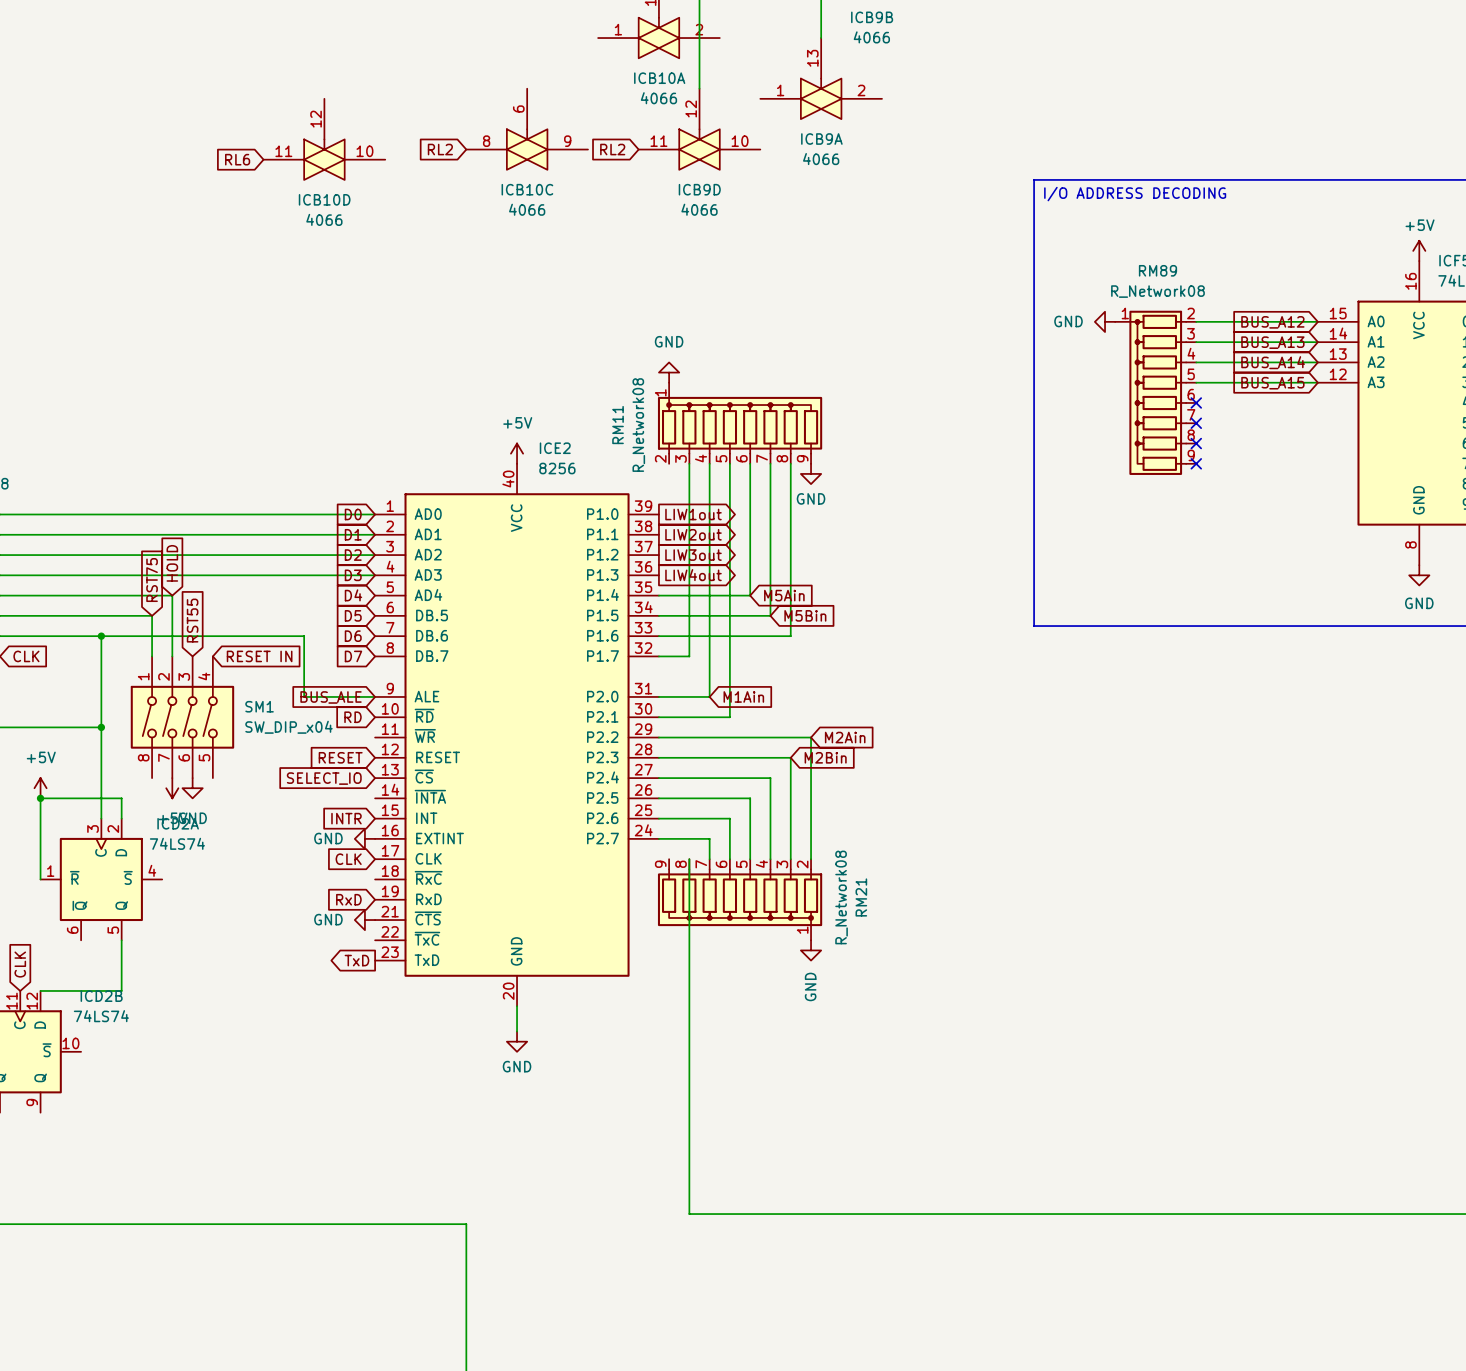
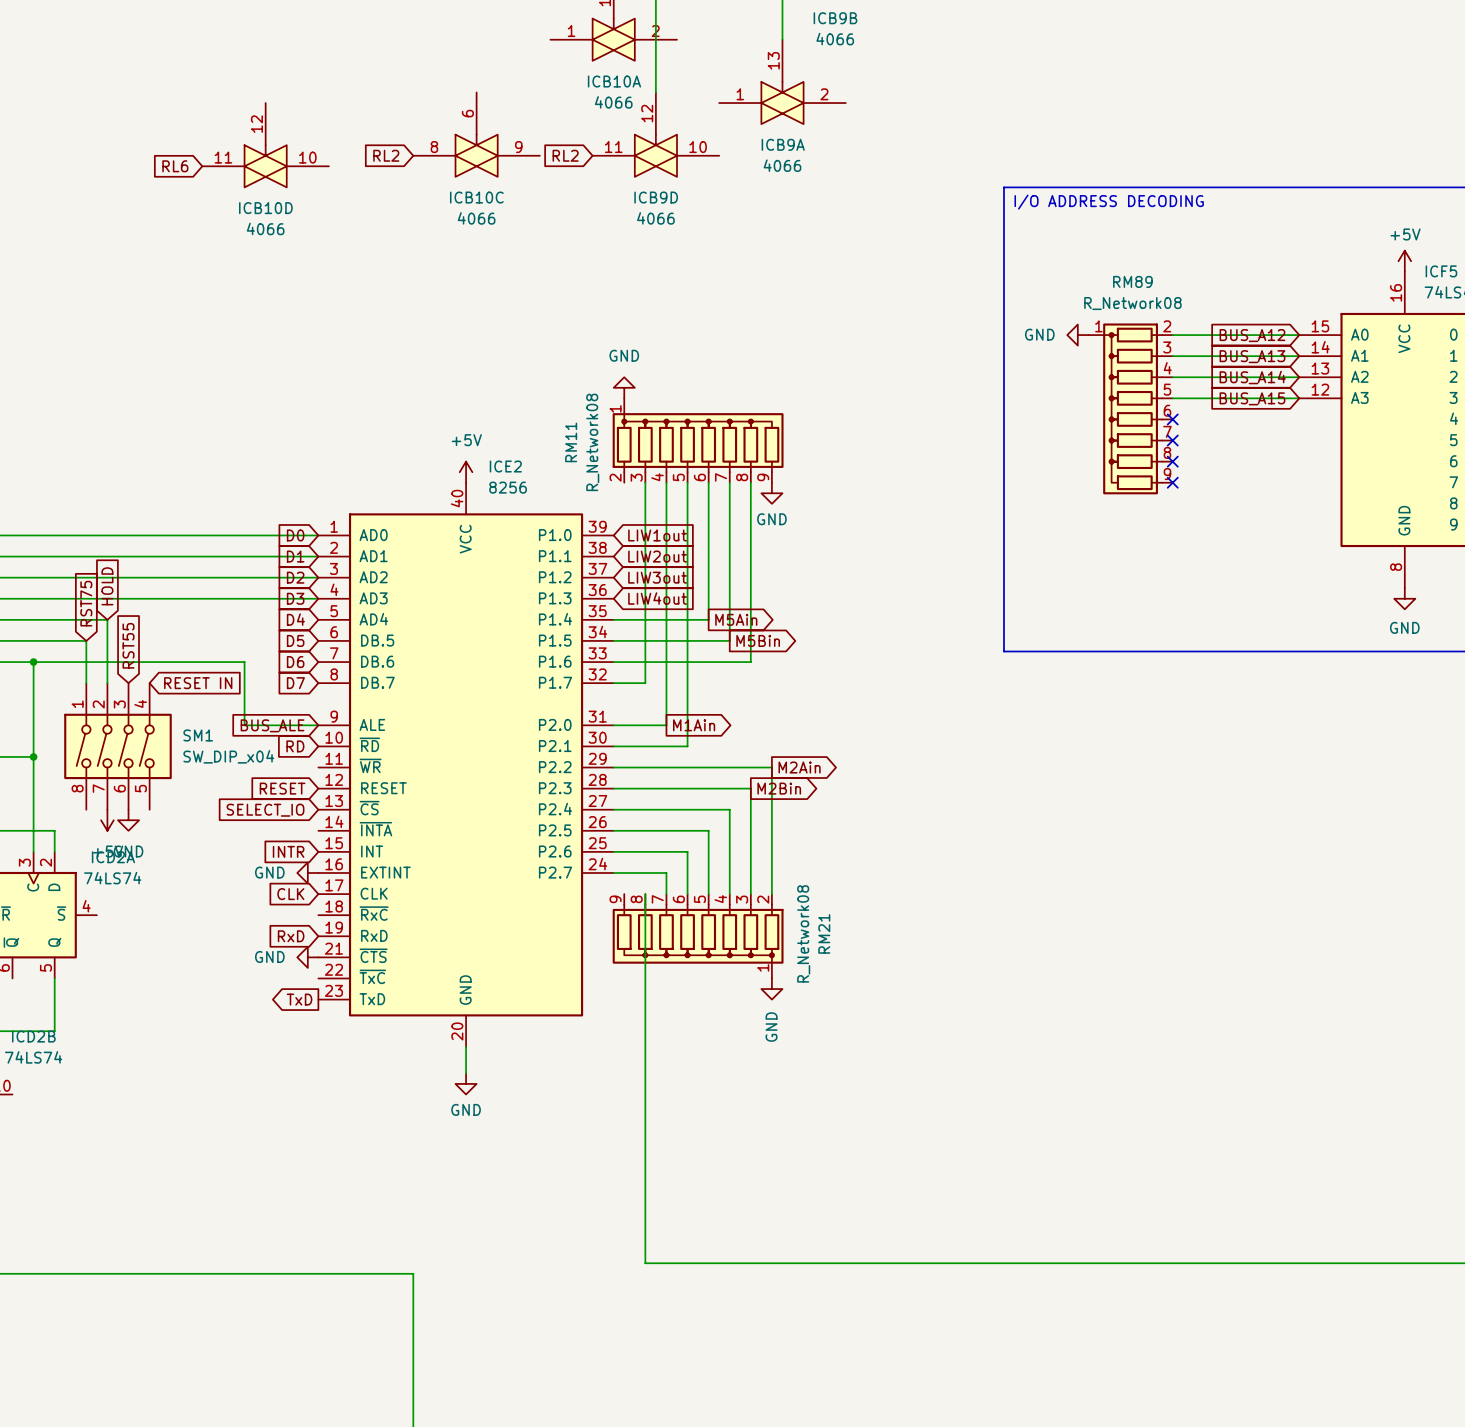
global label shape: output (693, 514) -> input (657, 535)
global label shape: output (693, 534) -> input (657, 556)
global label shape: output (693, 555) -> input (657, 577)
global label shape: output (693, 575) -> input (657, 598)
global label shape: input (784, 595) -> output (736, 619)
global label shape: input (805, 615) -> output (758, 640)
global label shape: input (743, 696) -> output (694, 725)
global label shape: input (845, 737) -> output (799, 767)
global label shape: input (825, 757) -> output (779, 788)

